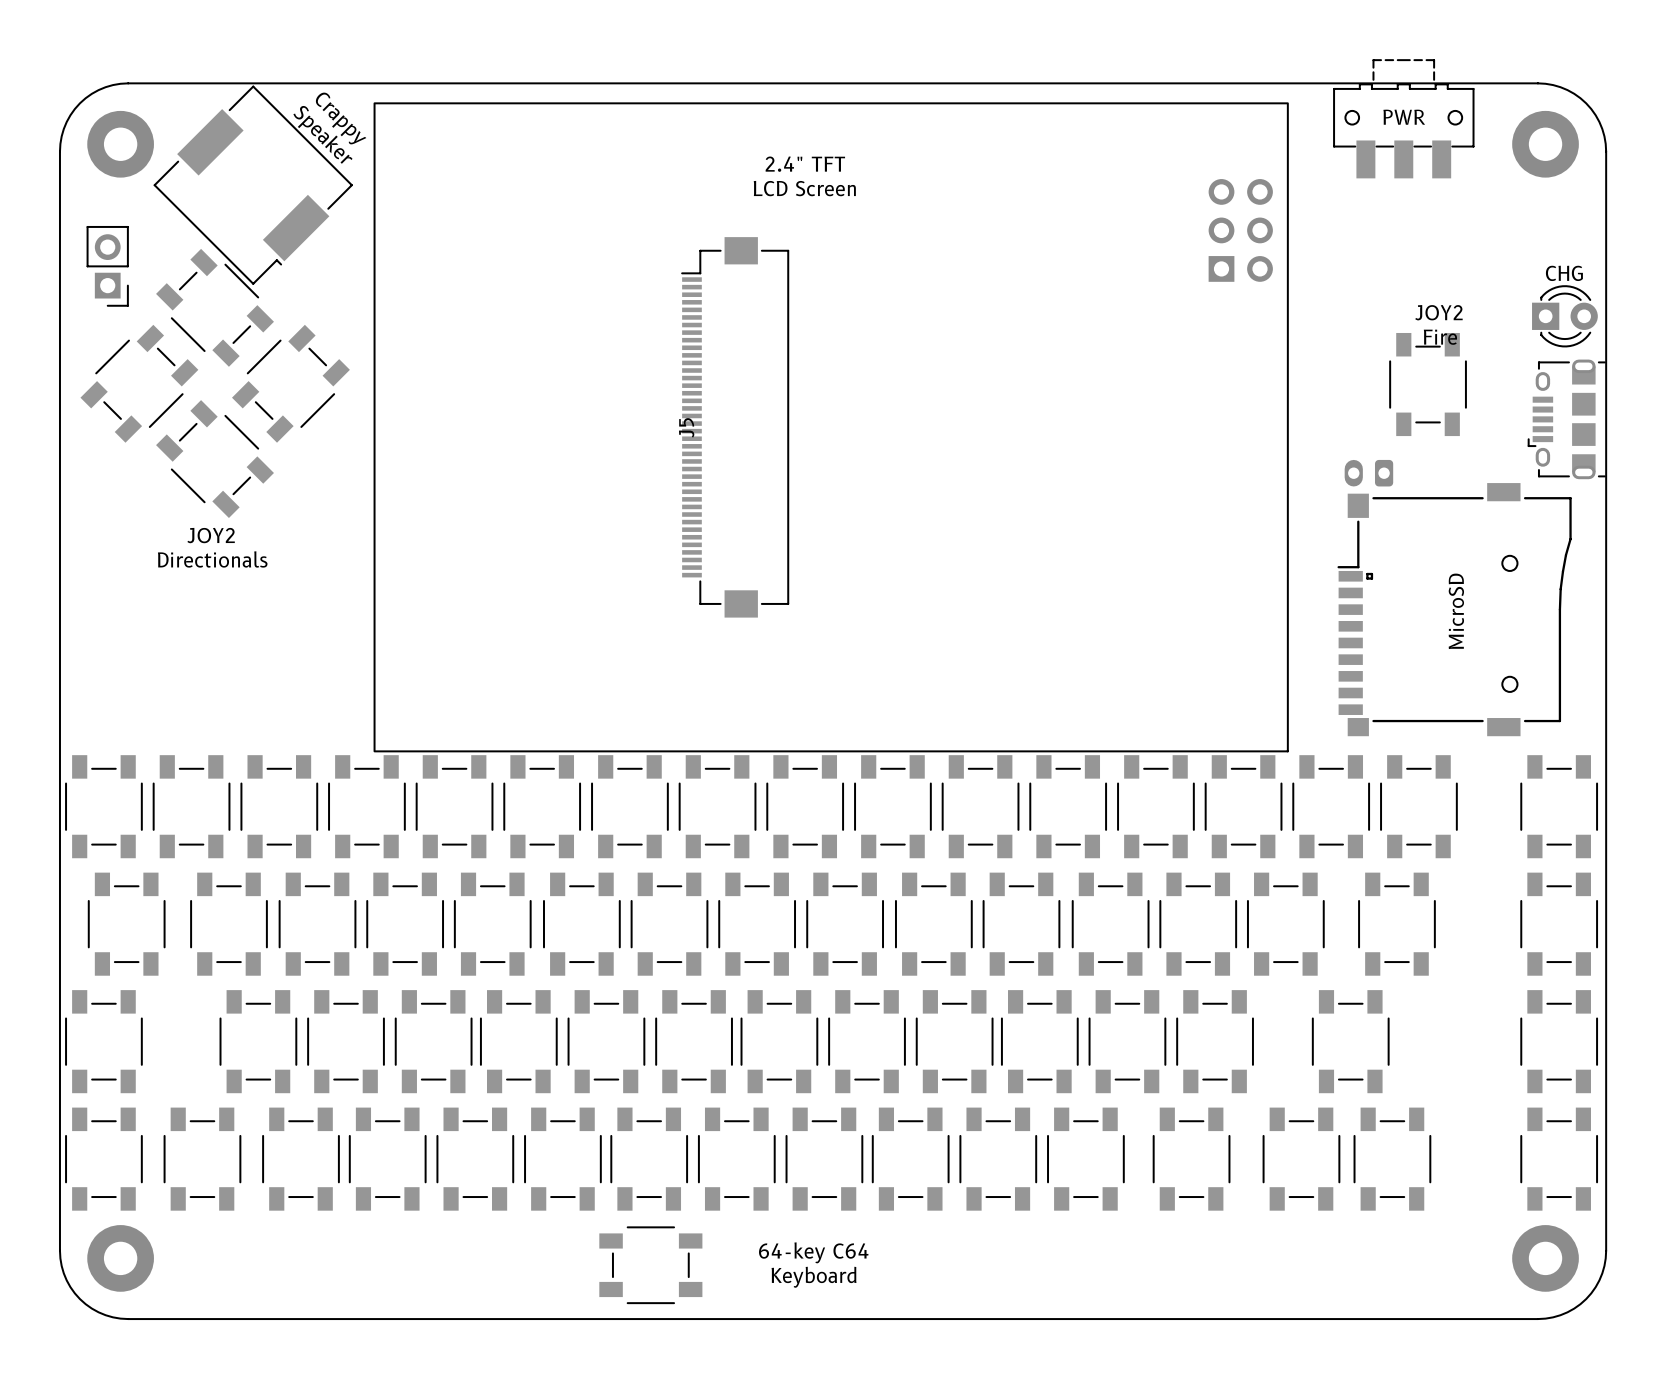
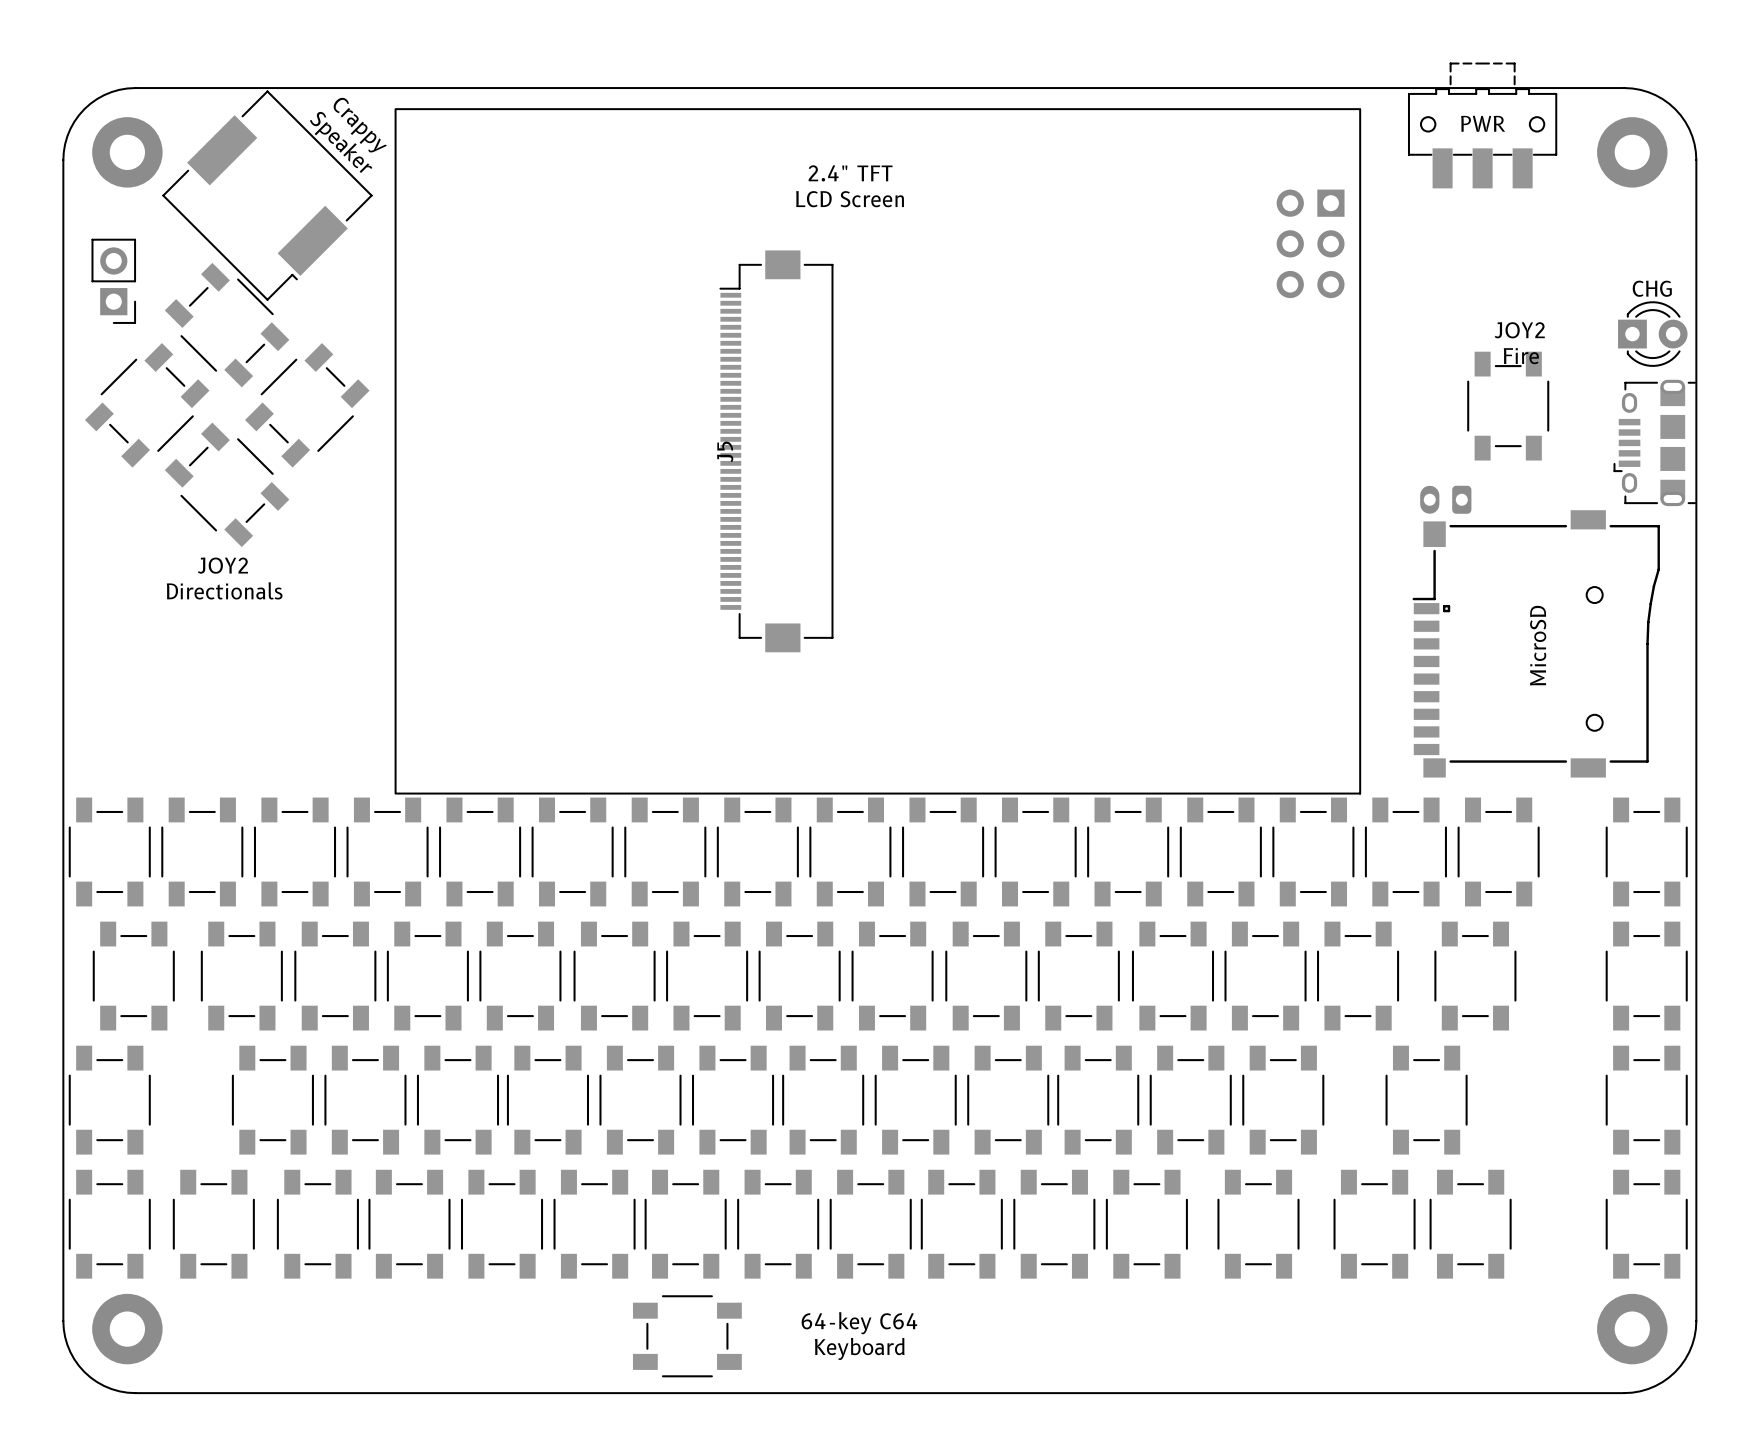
part rotation: 0° (1240, 230) -> 180° (1310, 243)

